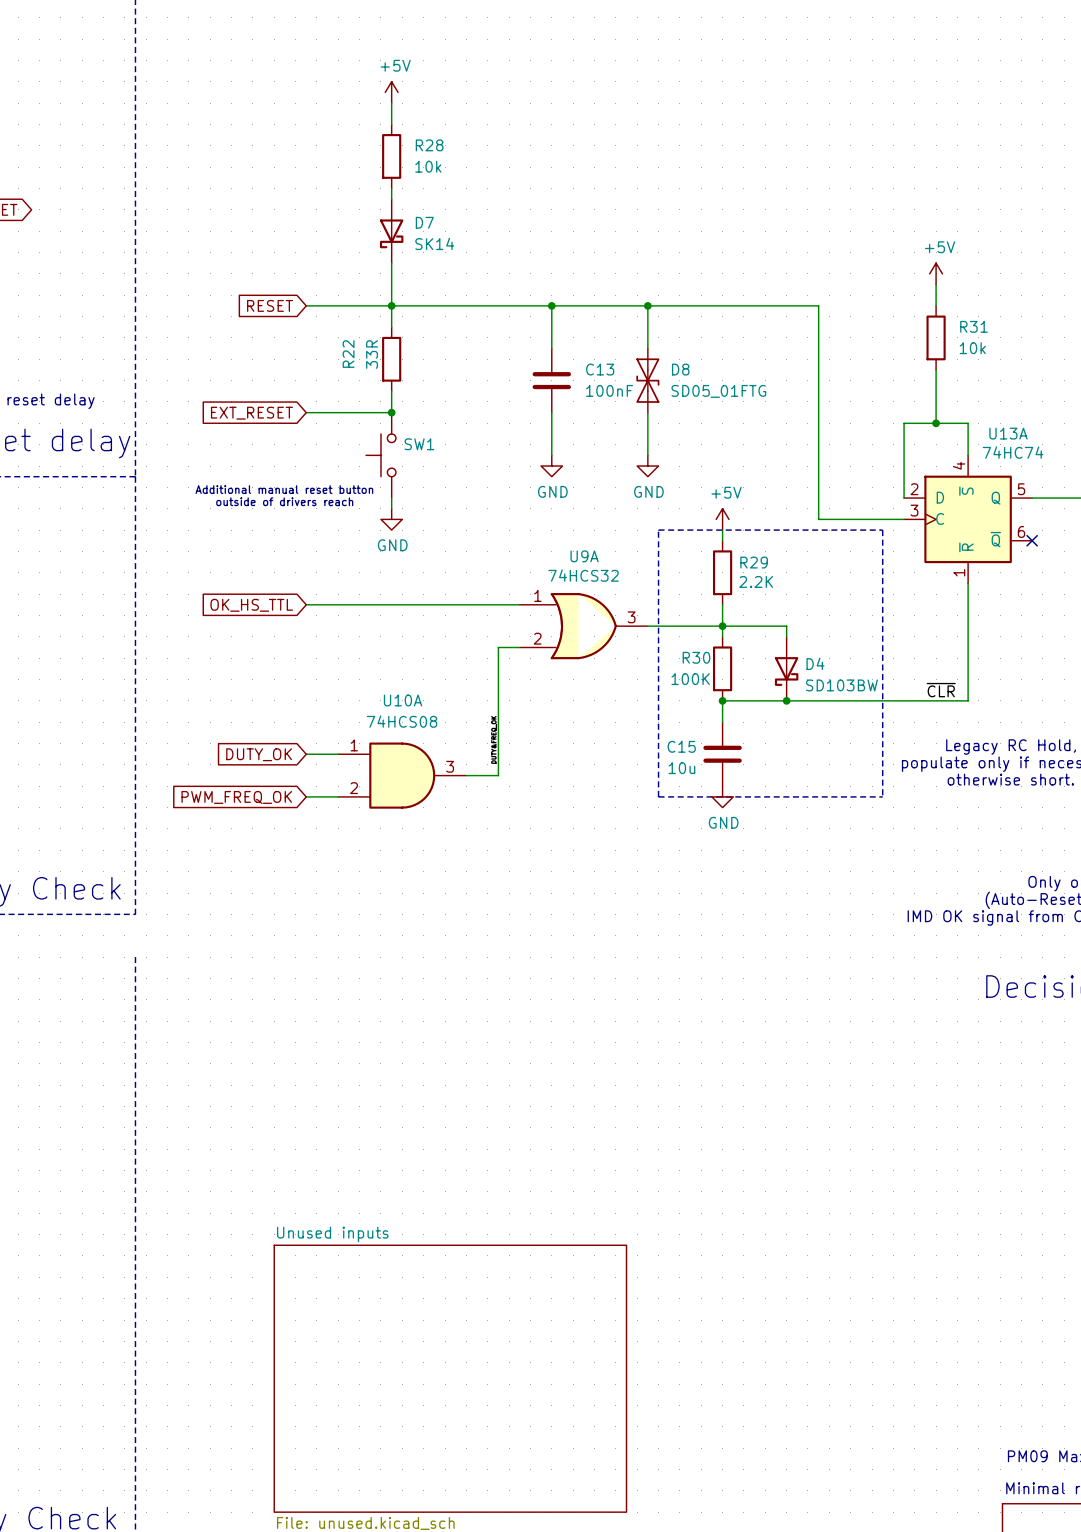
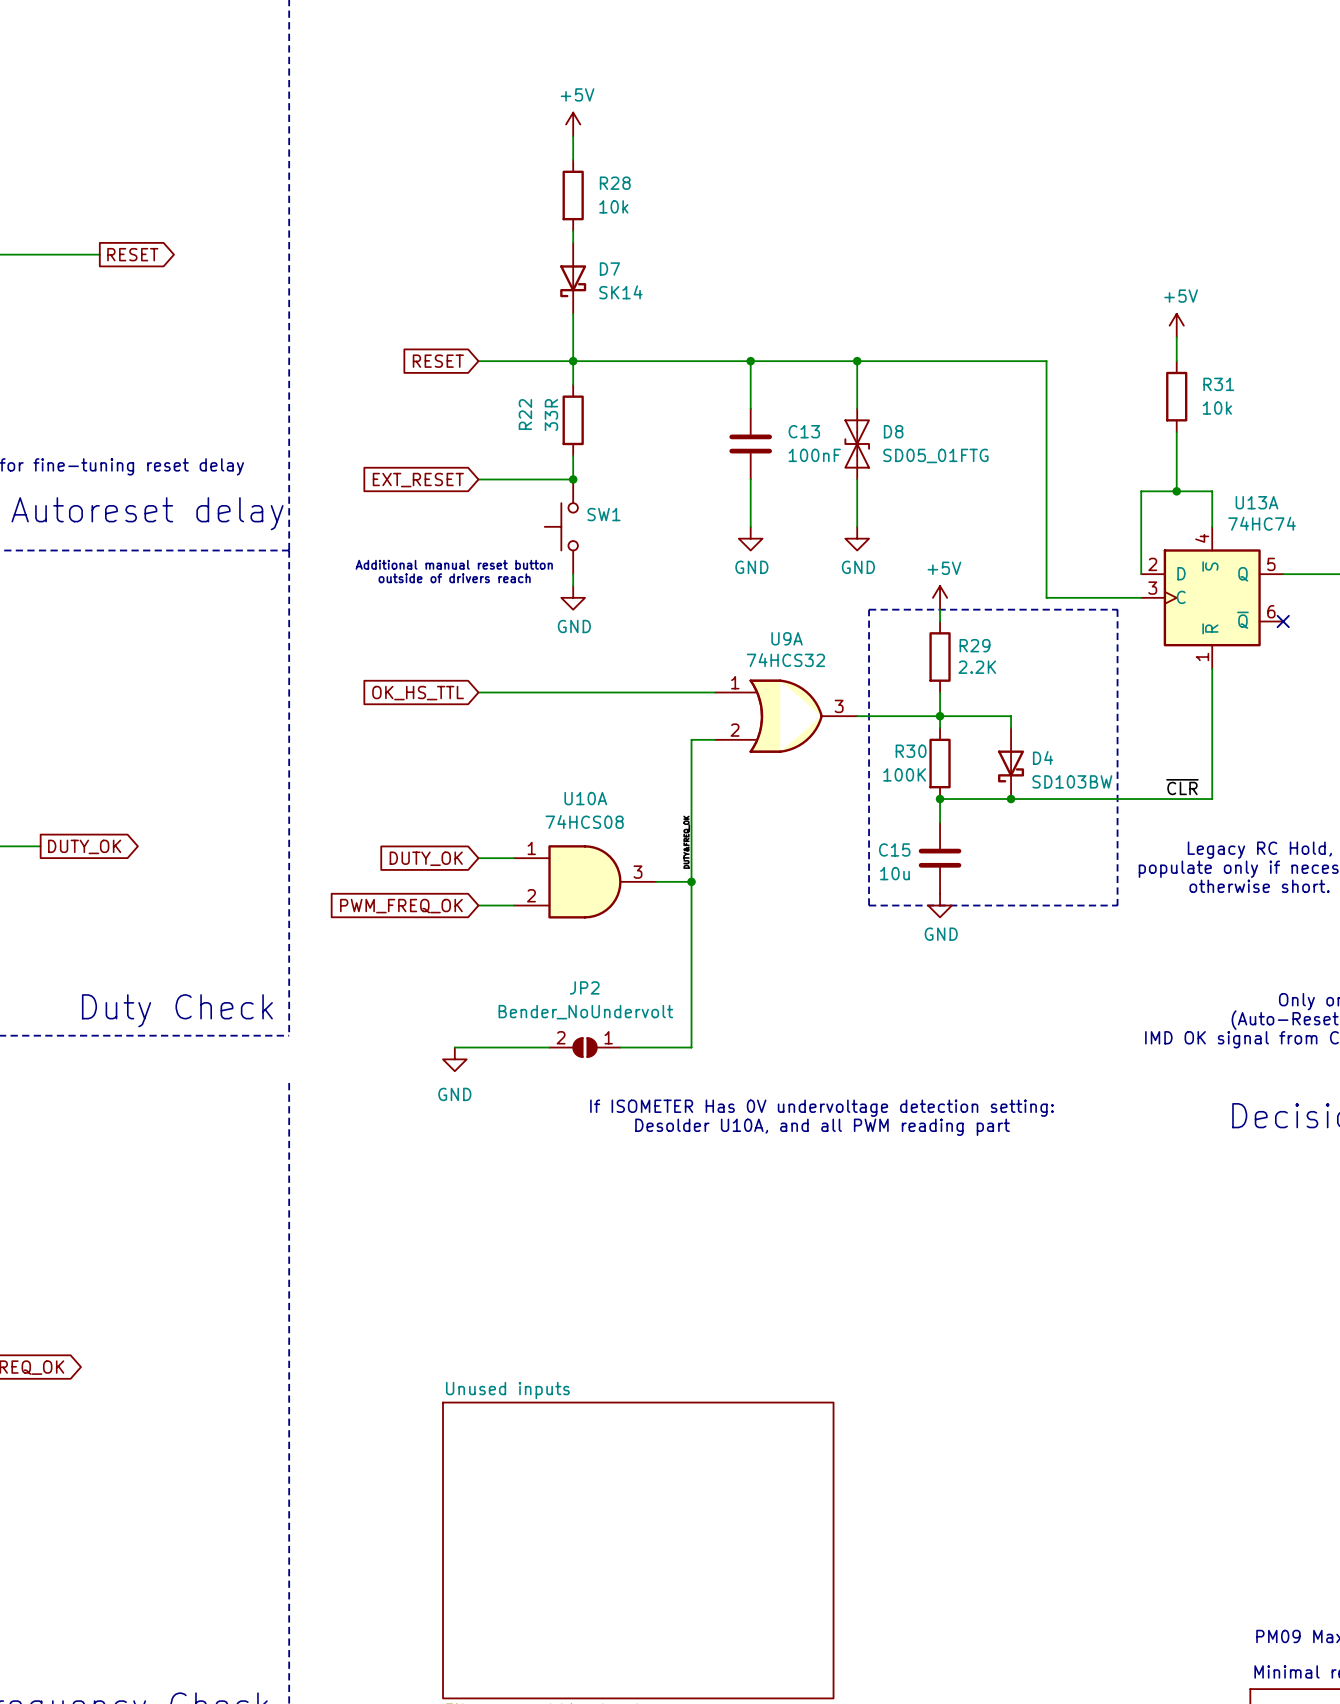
wire: none -> (691, 881) (691, 1047) (620, 1047)
junction: none -> (691, 881)
wire: none -> (454, 1047) (549, 1047)
JP2: none -> Bender_NoUndervolt (585, 1047)
power symbol: none -> GND (454, 1059)
text: none -> If ISOMETER Has 0V undervoltage detection setting: (821, 1108)
text: none -> Desolder U10A, and all PWM reading part (822, 1127)

